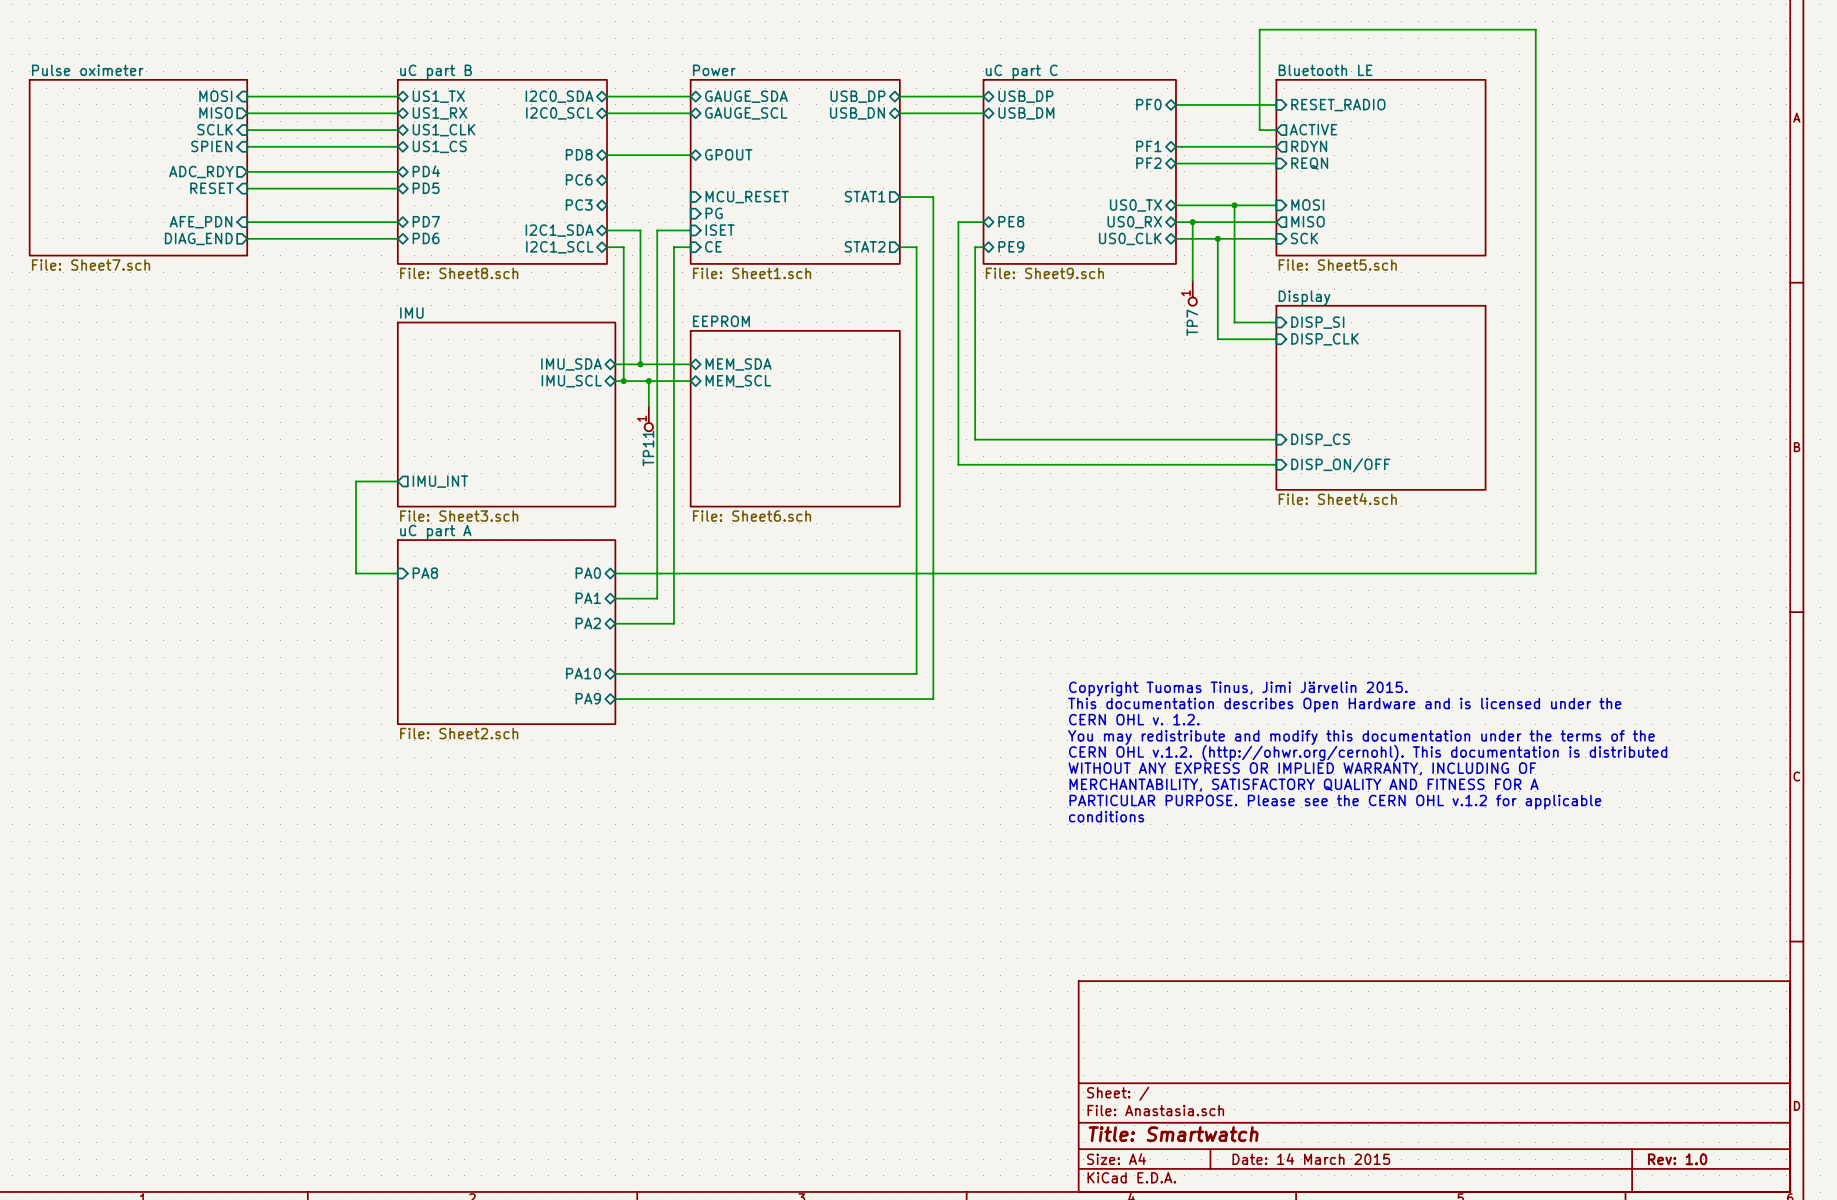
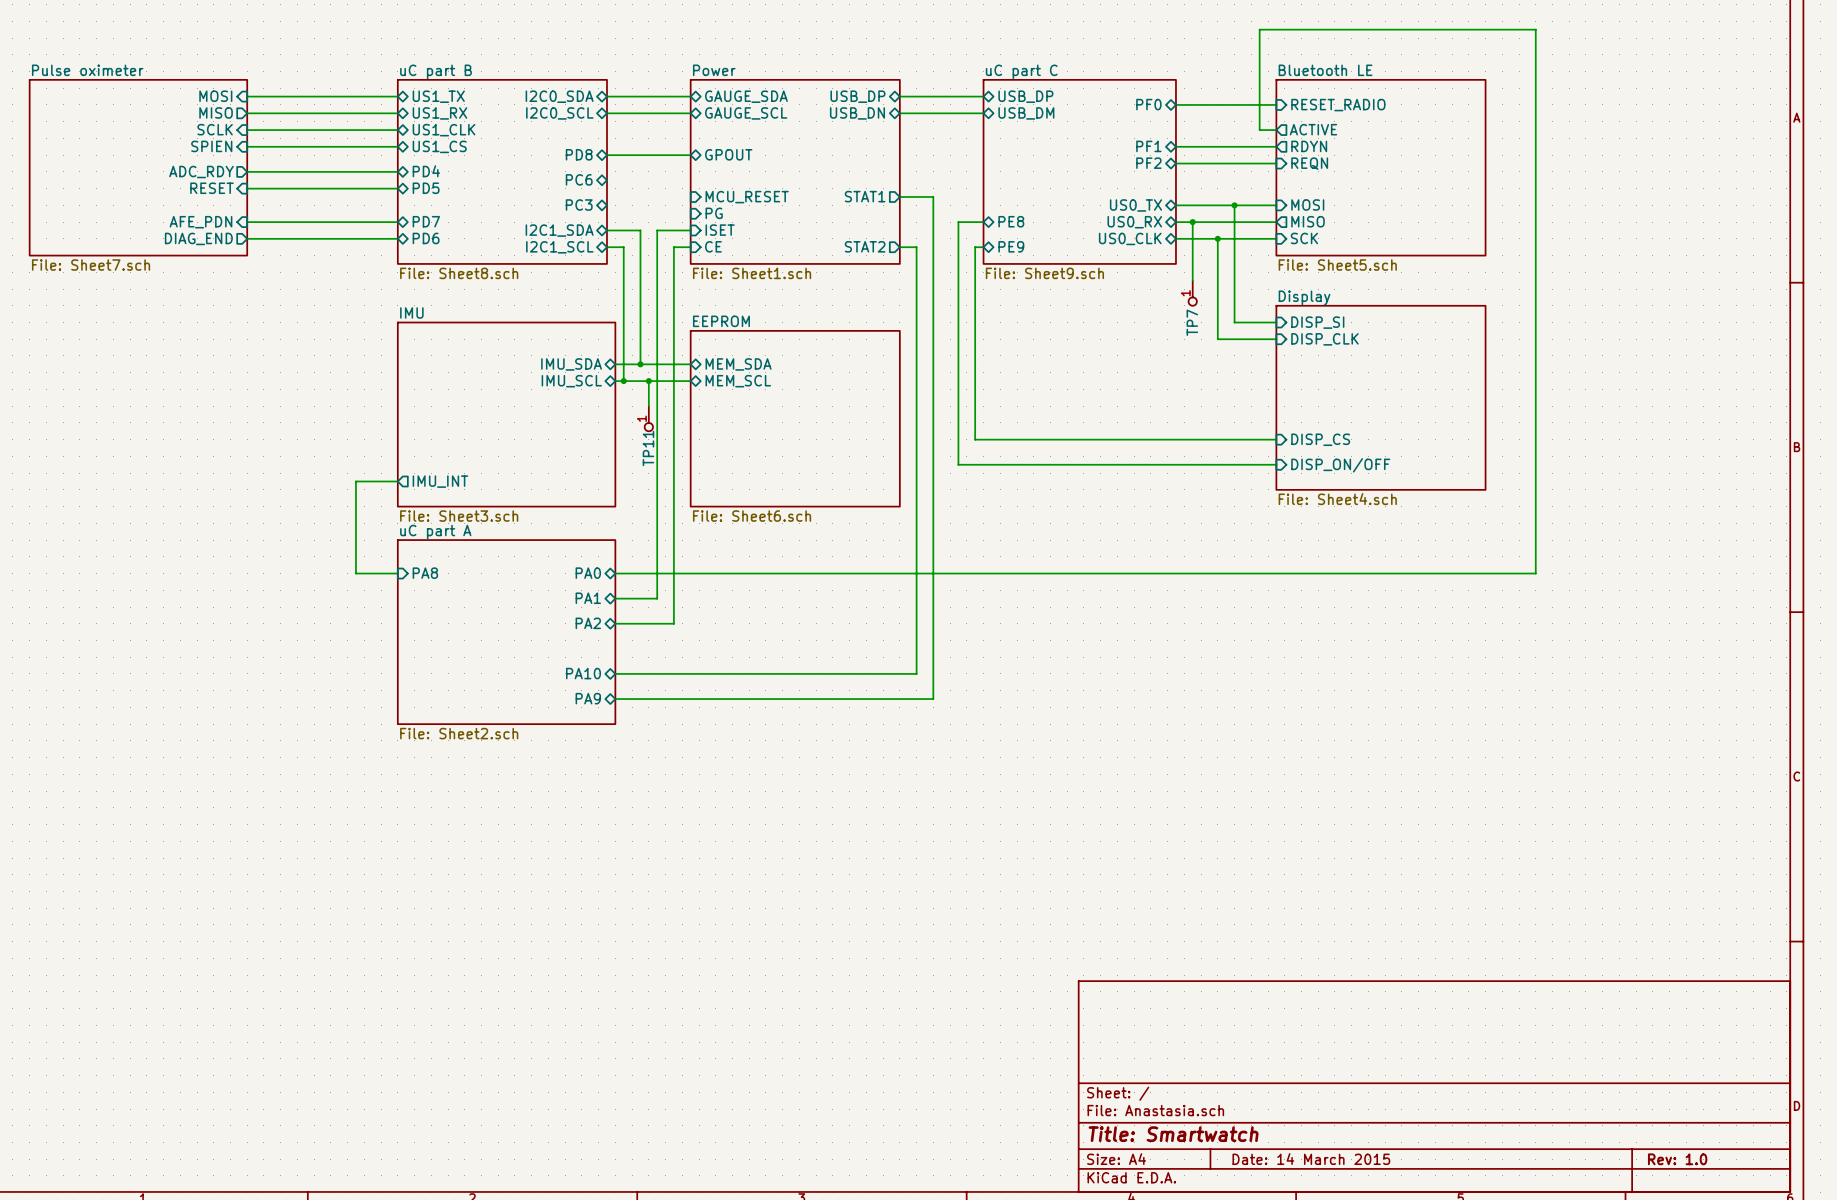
text: Copyright Tuomas Tinus, Jimi Järvelin 2015. (1238, 689) -> none
text: This documentation describes Open Hardware and is licensed under the (1344, 705) -> none
text: CERN OHL v. 1.2. (1134, 719) -> none
text: You may redistribute and modify this documentation under the terms of the (1361, 737) -> none
text: CERN OHL v.1.2. (http://ohwr.org/cernohl). This documentation is distributed (1368, 753) -> none
text: WITHOUT ANY EXPRESS OR IMPLIED WARRANTY, INCLUDING OF (1302, 768) -> none
text: MERCHANTABILITY, SATISFACTORY QUALITY AND FITNESS FOR A (1304, 785) -> none
text: PARTICULAR PURPOSE. Please see the CERN OHL v.1.2 for applicable (1335, 802) -> none
text: conditions (1106, 816) -> none

